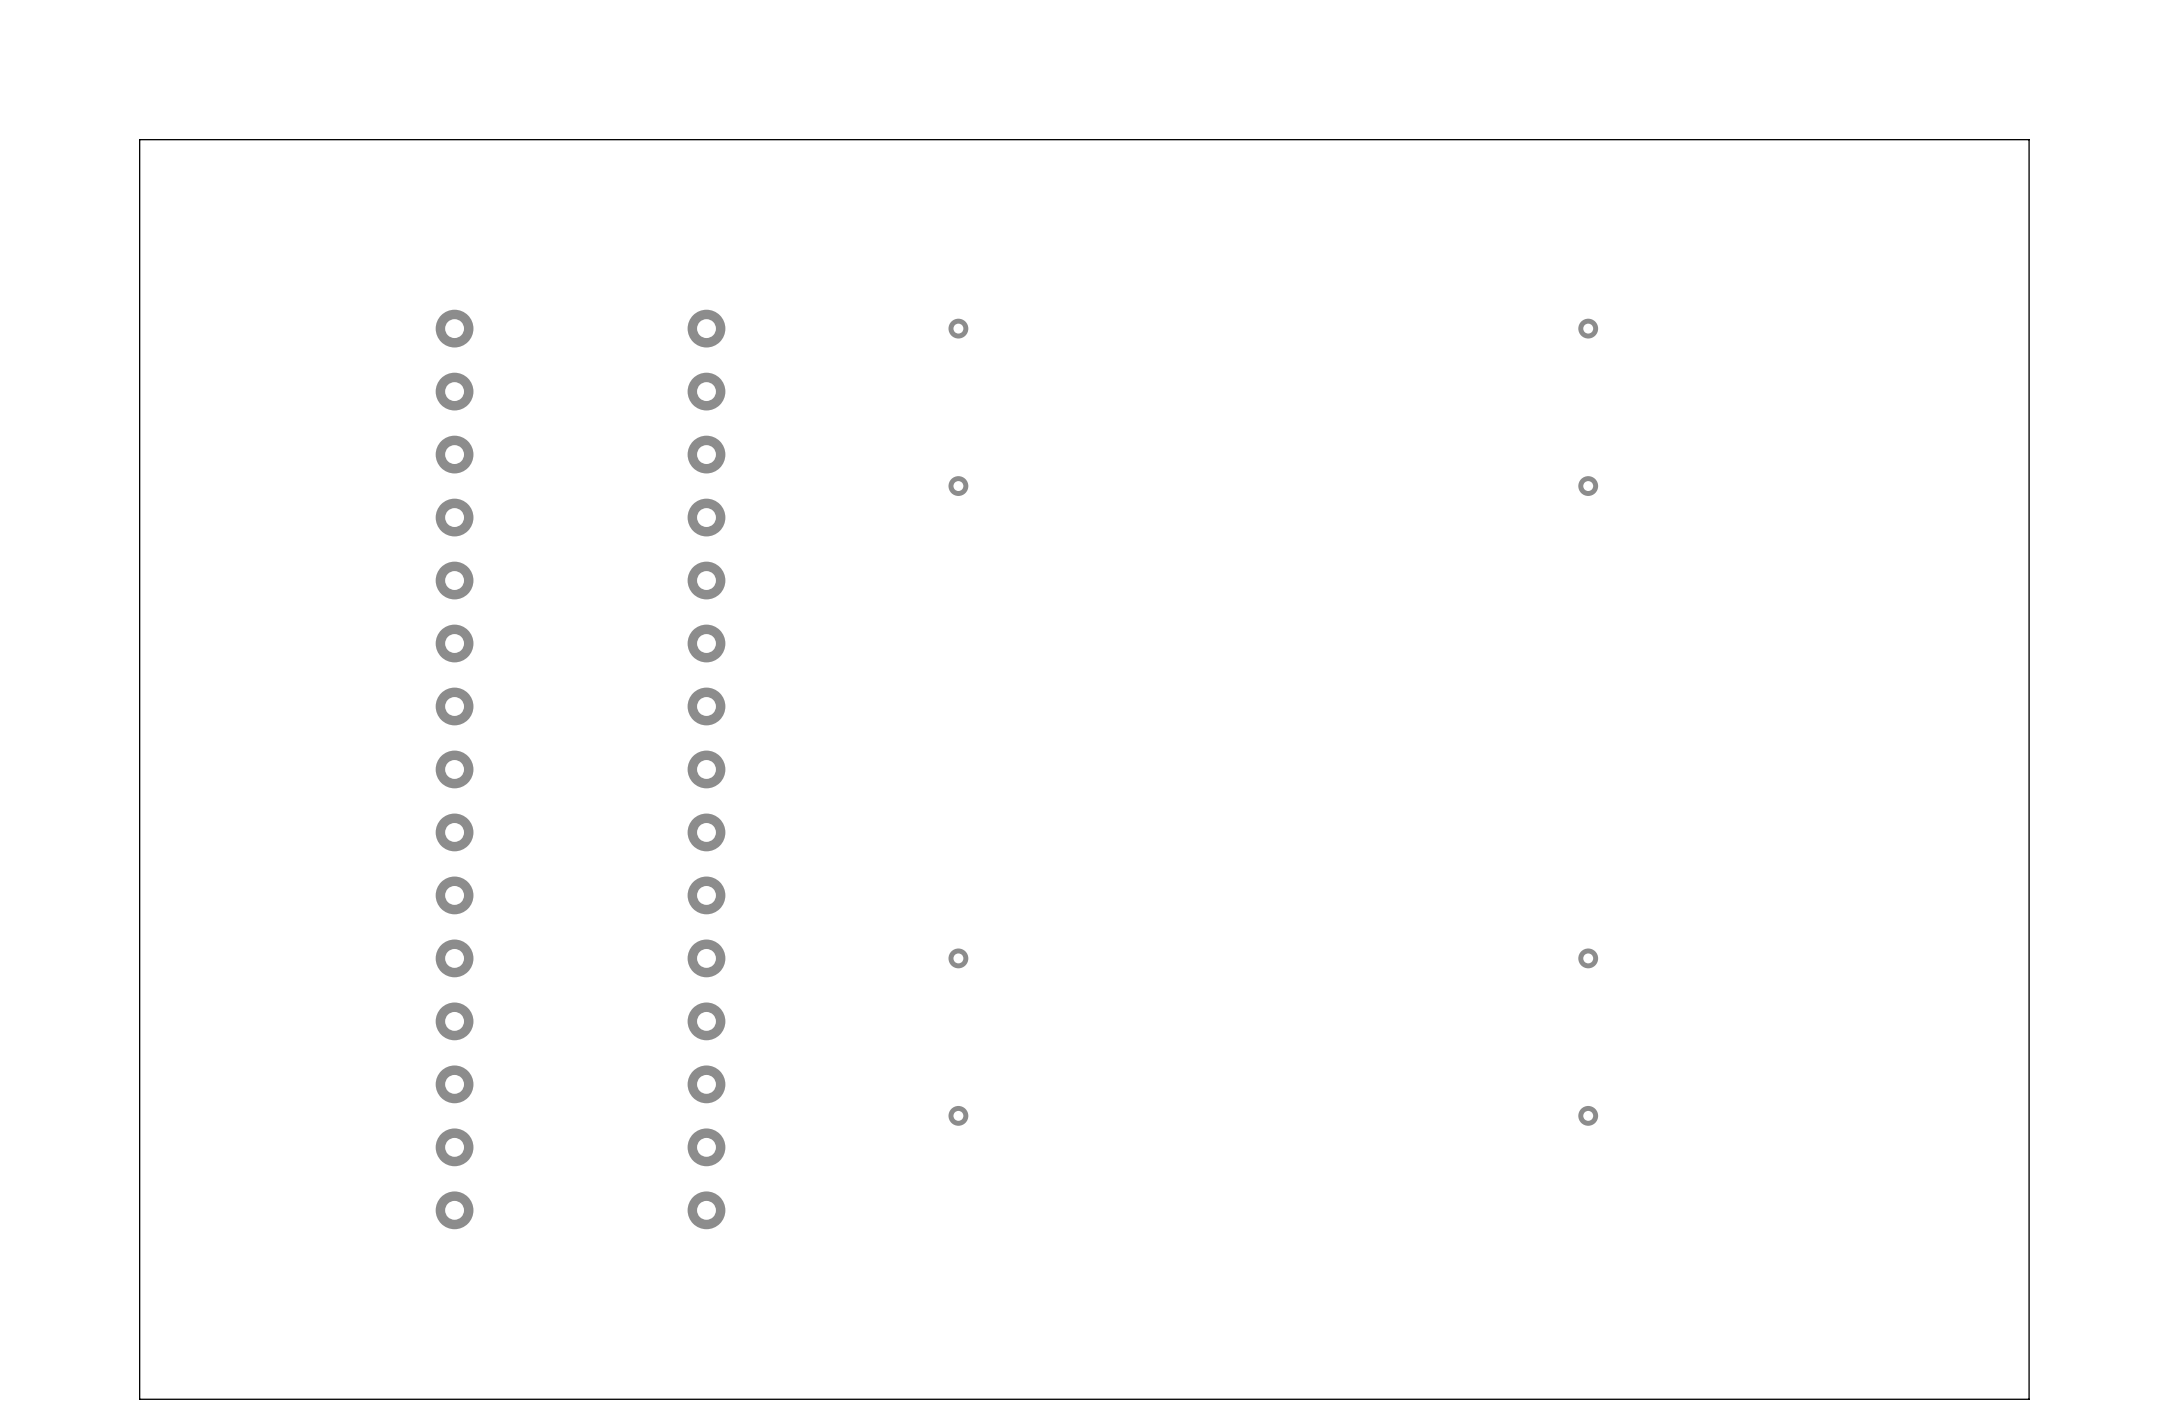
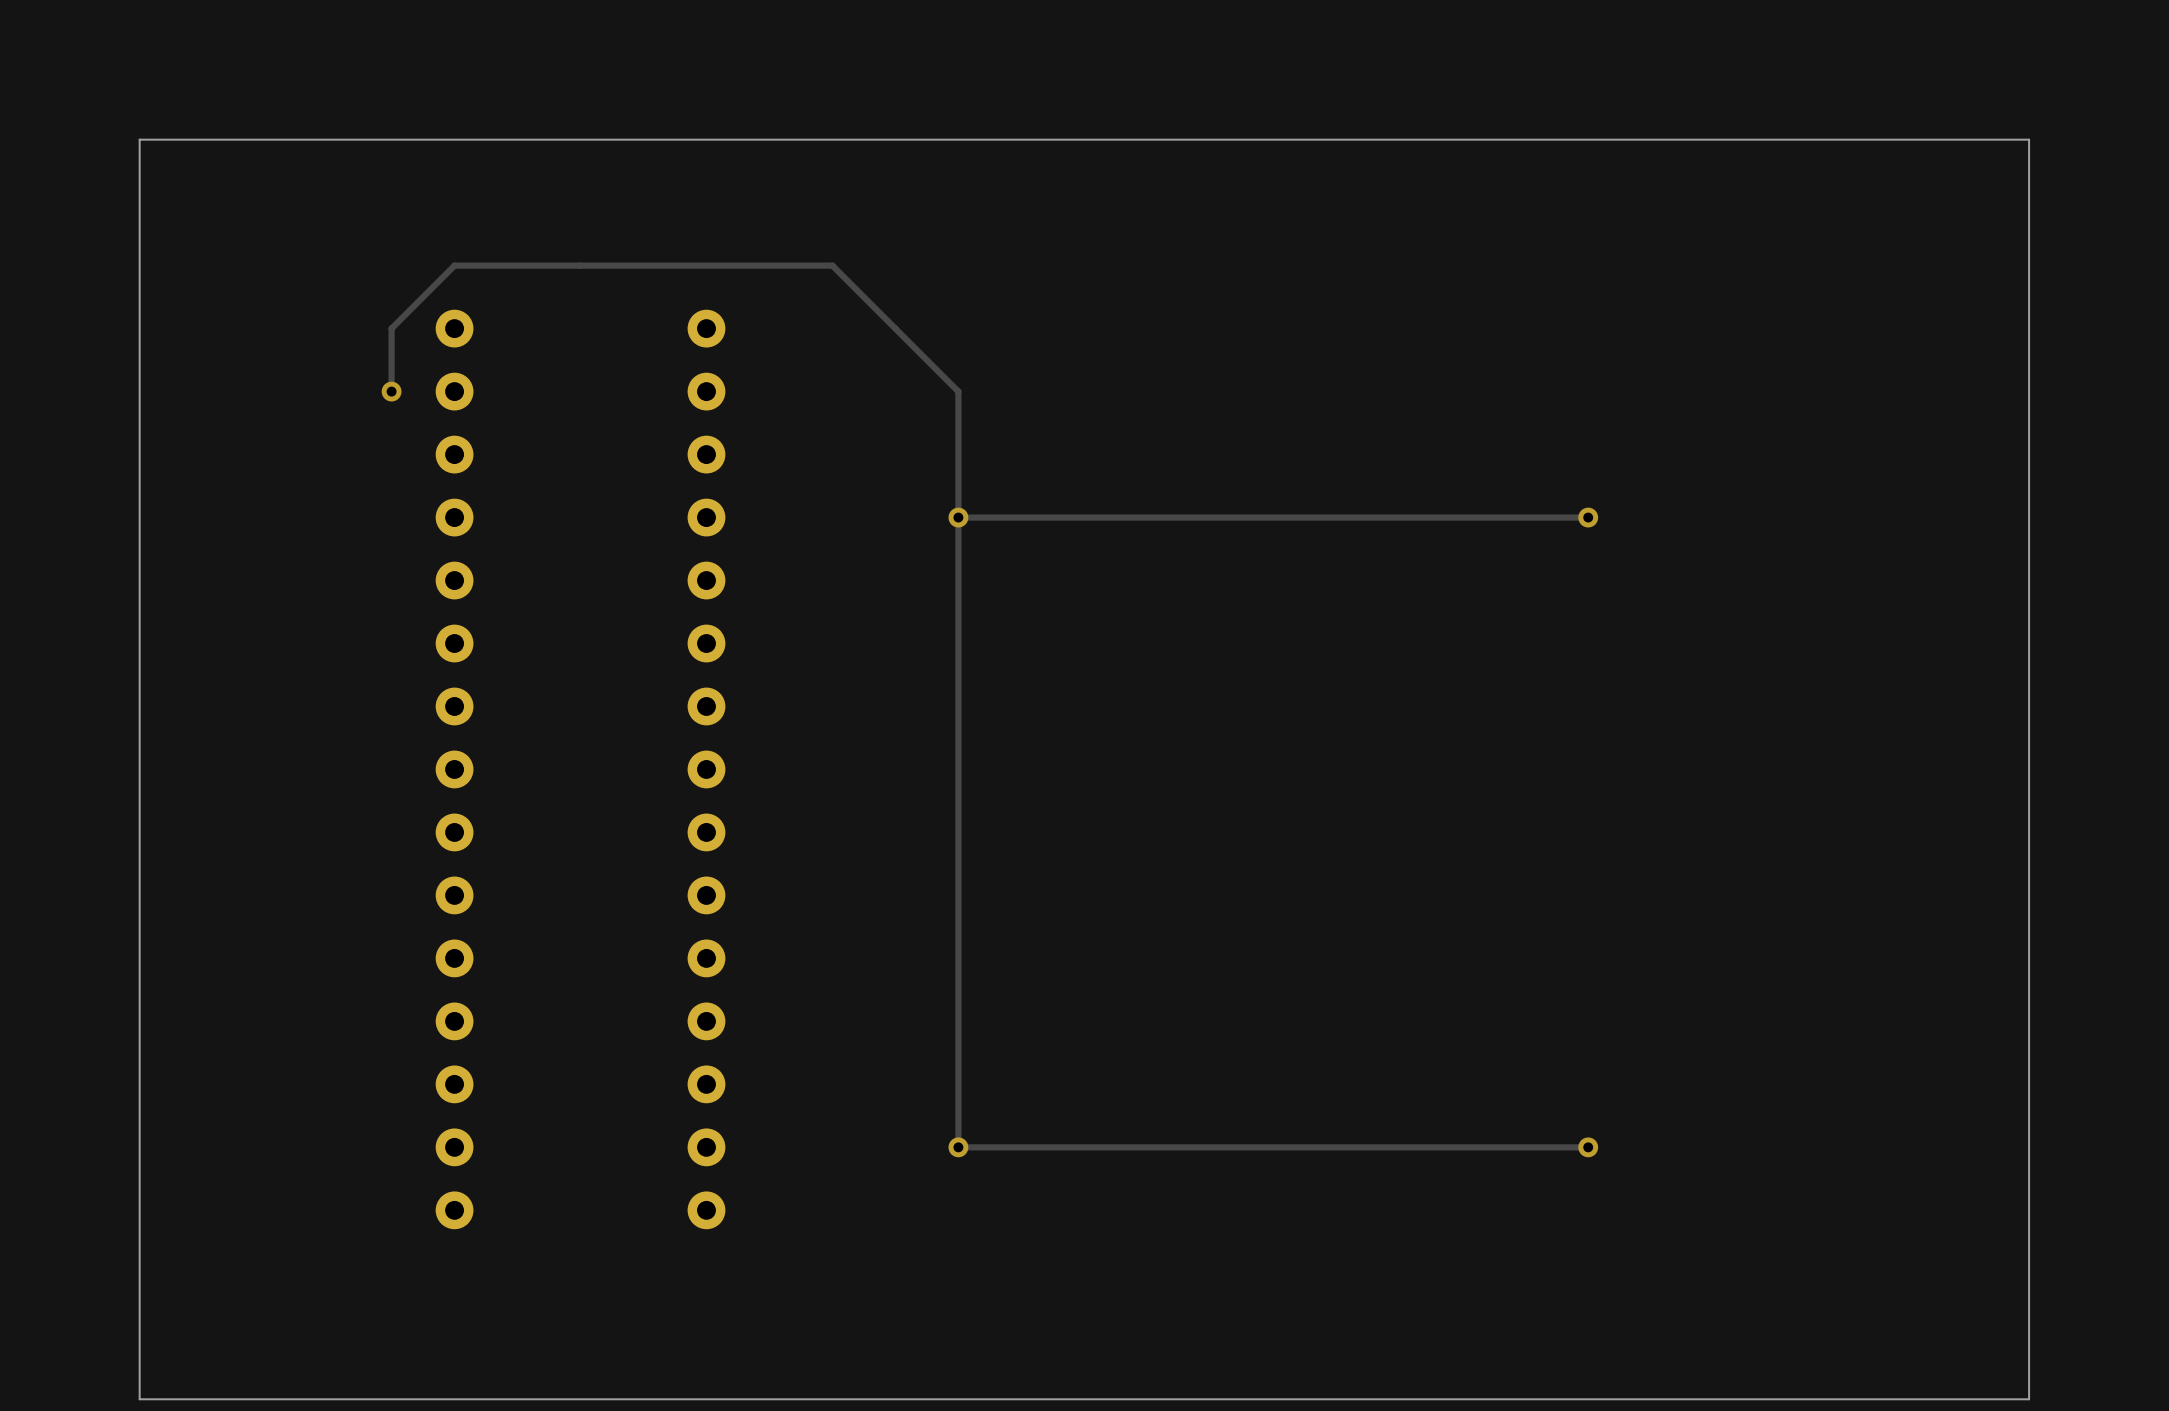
via: (958, 328) -> none
via: (1588, 328) -> none
track: none -> (391, 391) (391, 328) (454, 265) (832, 265) (958, 391) (958, 1147) (1588, 1147)
via: none -> (391, 391)
via position: (958, 486) -> (958, 517)
via position: (1588, 486) -> (1588, 517)
track: none -> (1588, 517) (958, 517)
via: (958, 958) -> none
via: (1588, 958) -> none
via position: (958, 1115) -> (958, 1147)
via position: (1588, 1115) -> (1588, 1147)

